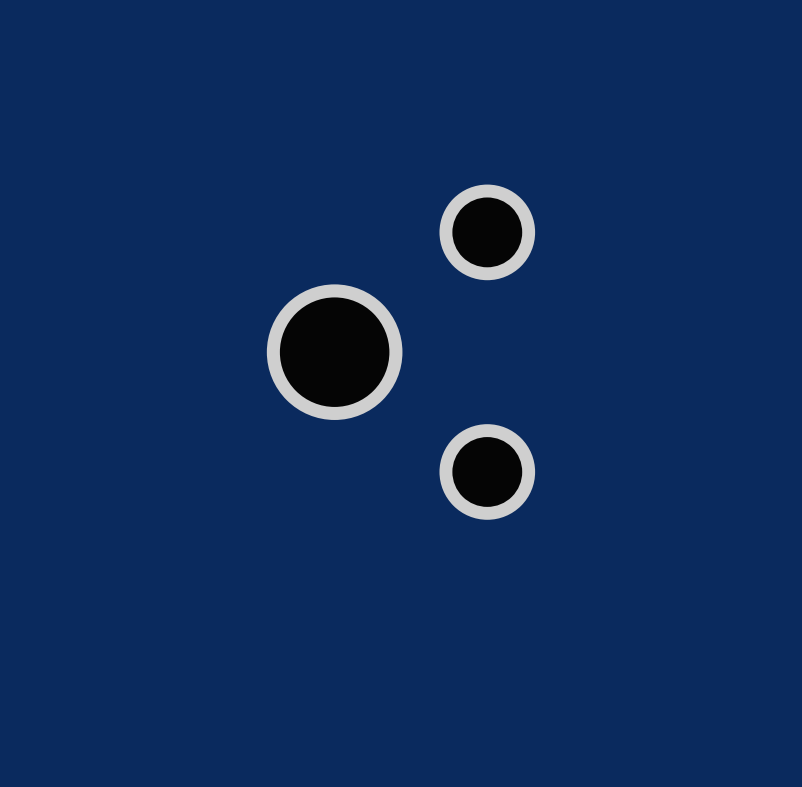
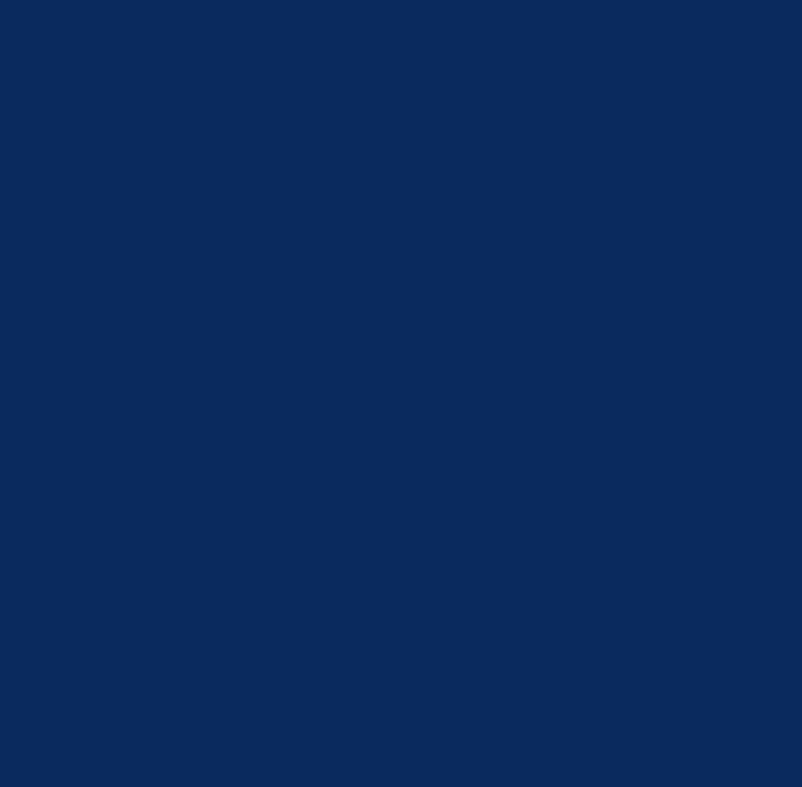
part: (400, 352) -> none

